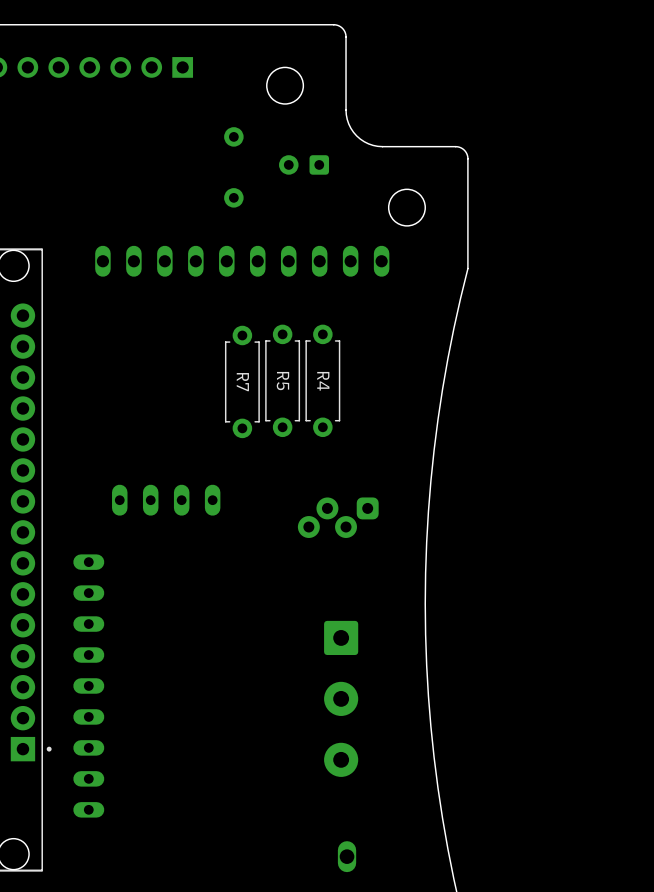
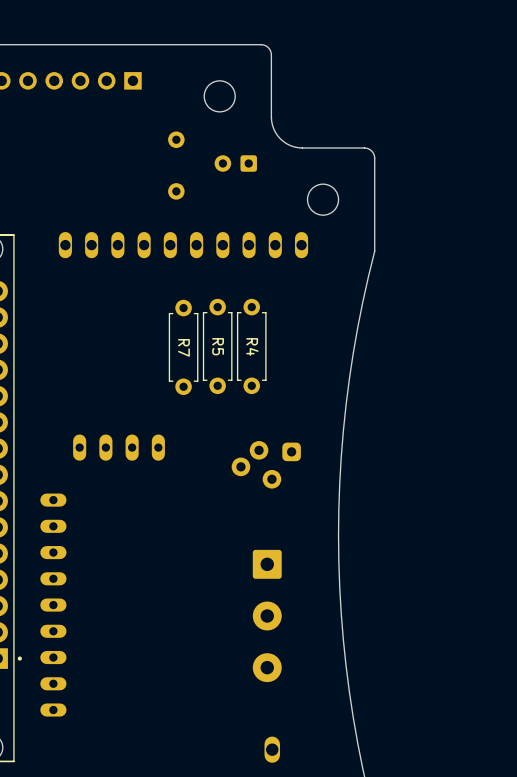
part footprint: [297, 497, 379, 538] -> [231, 441, 301, 489]

